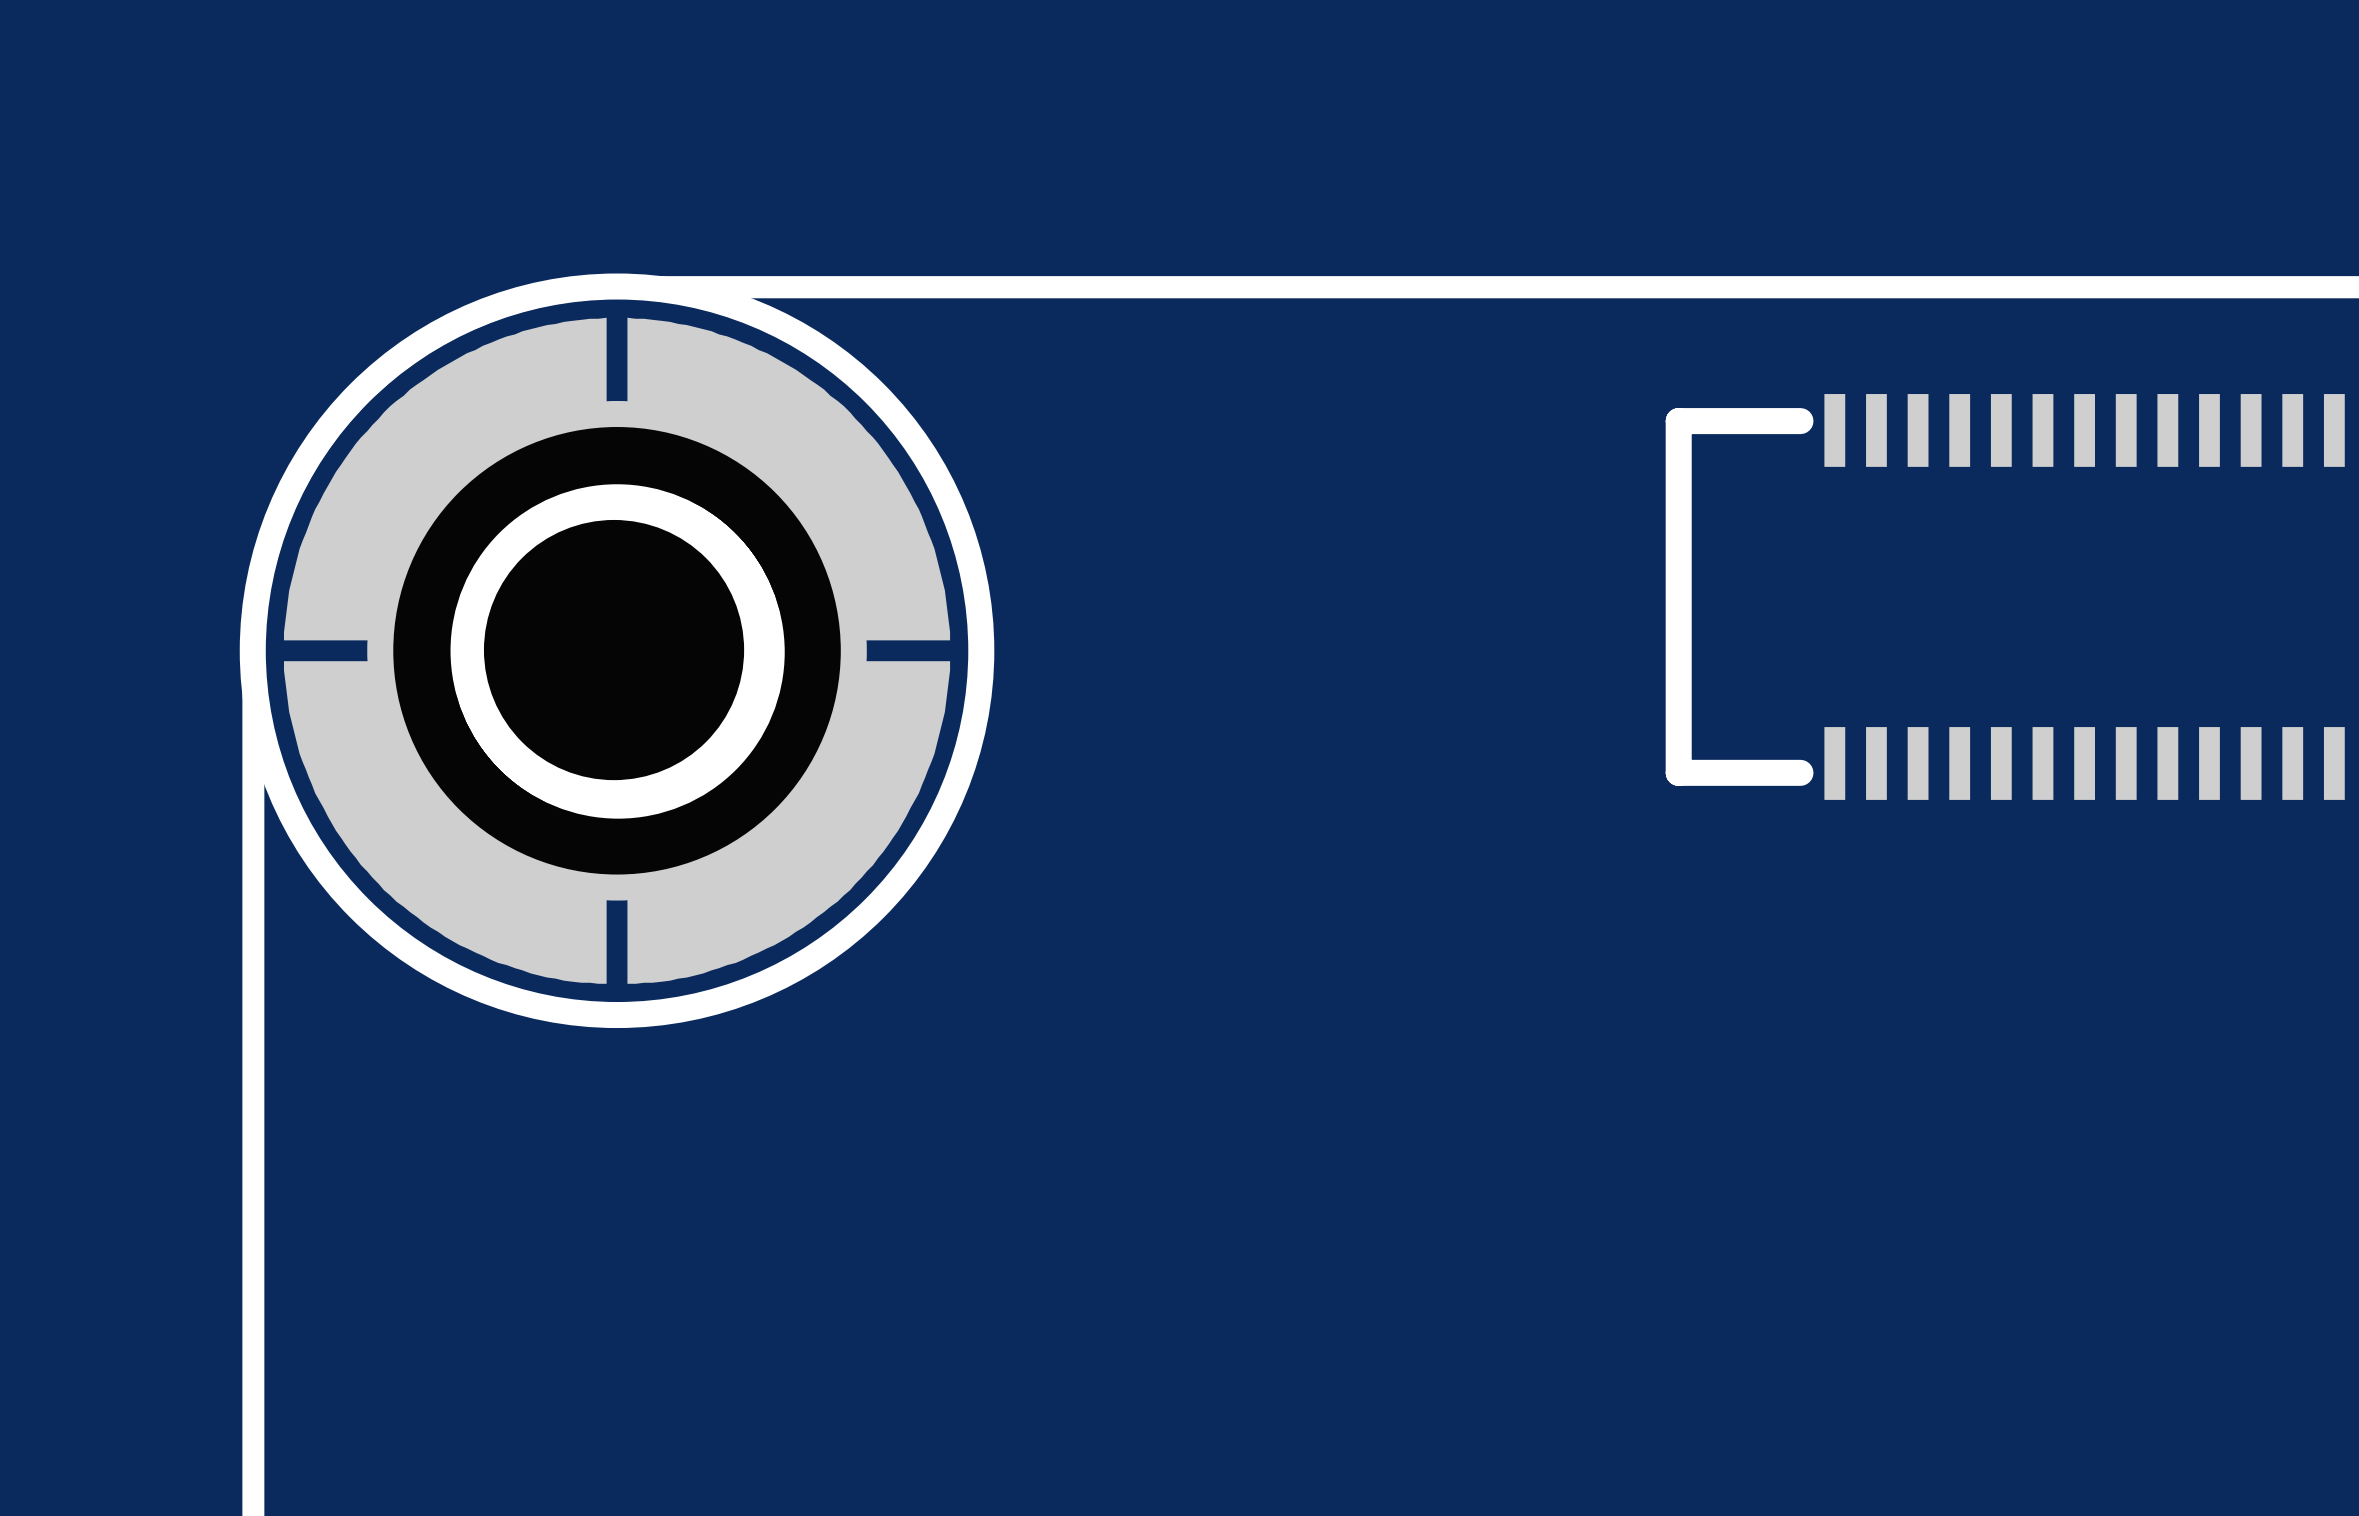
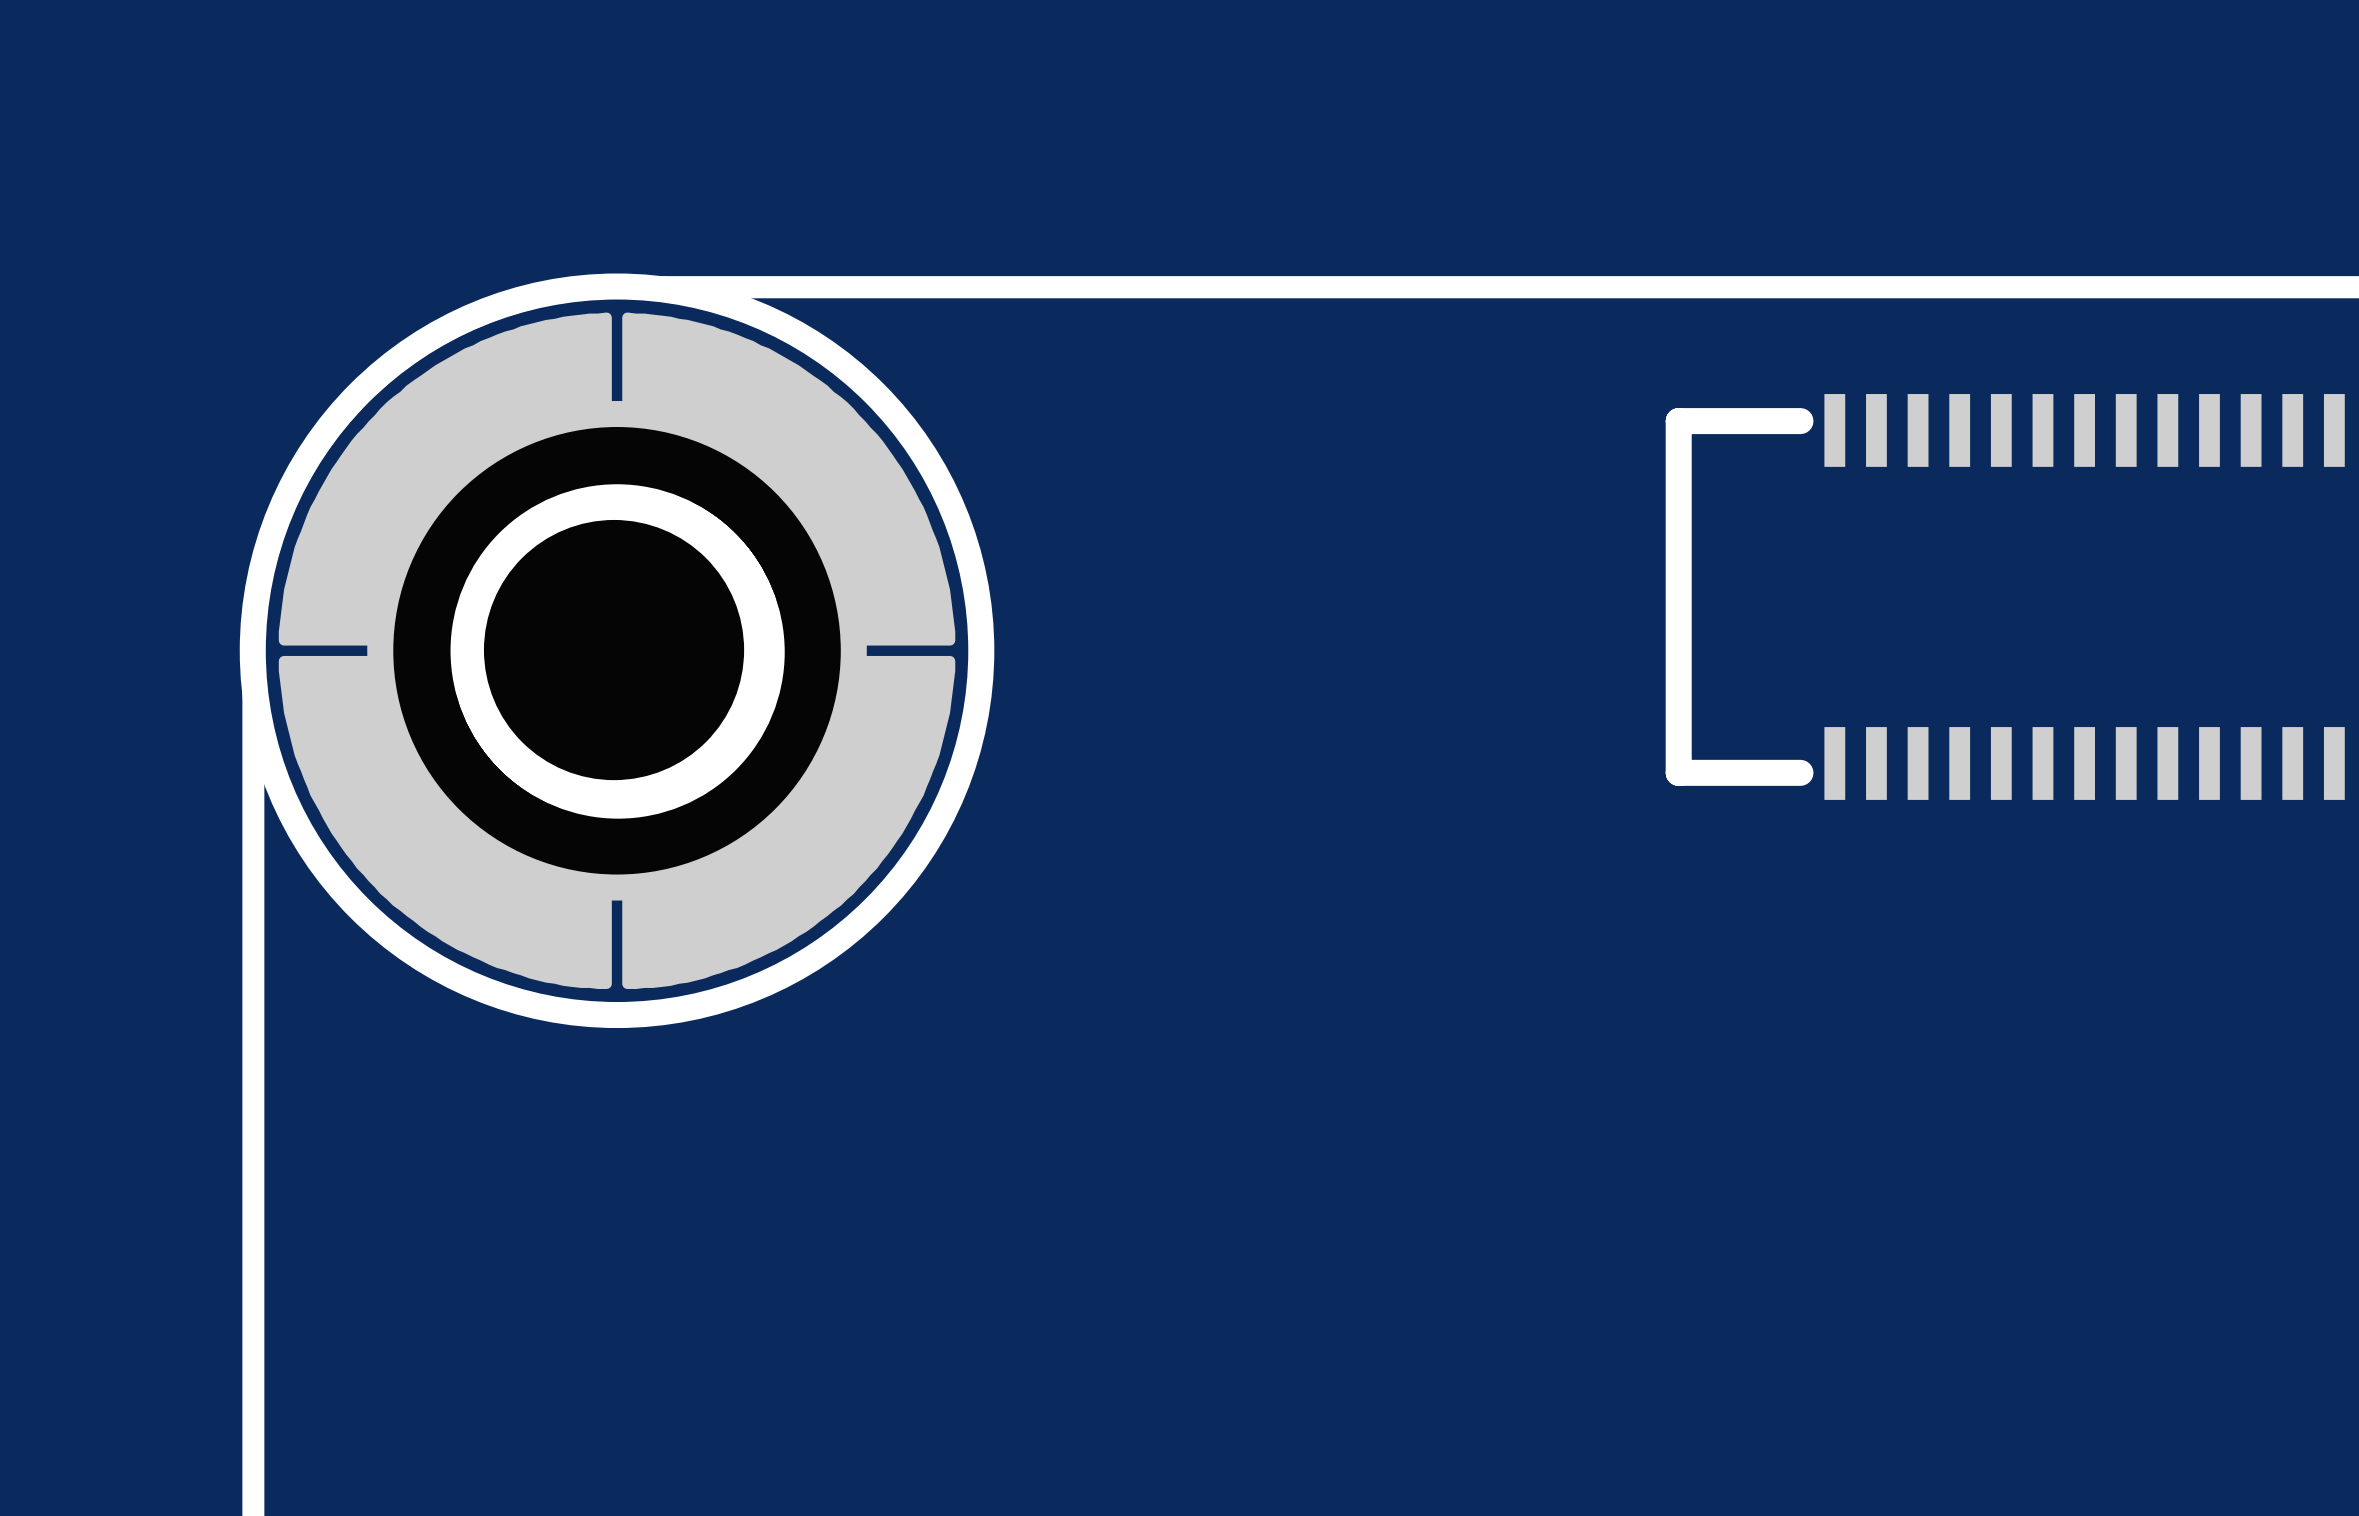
part footprint: [239, 273, 995, 1029] -> [239, 273, 995, 1029]

